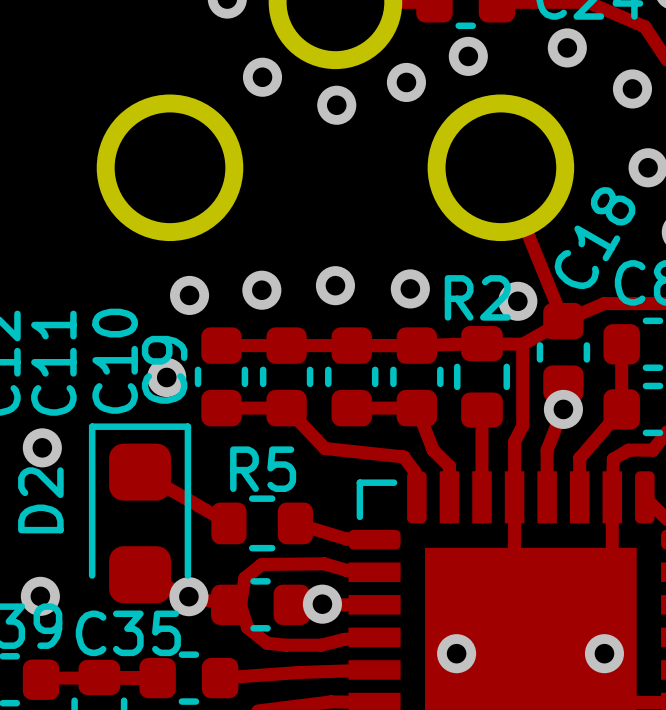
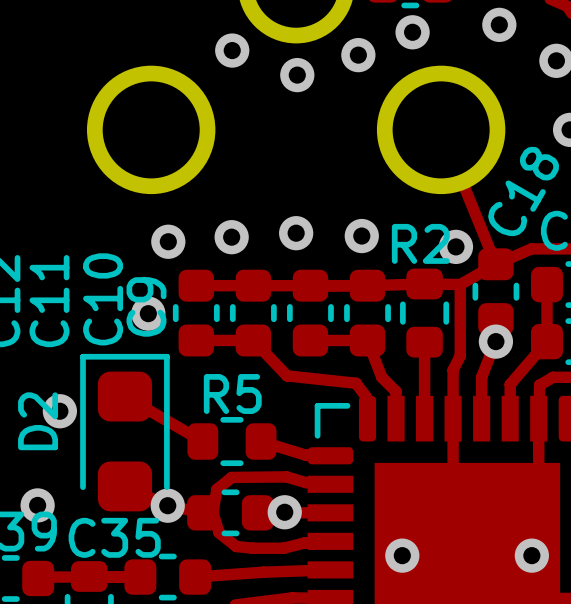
via position: (42, 447) -> (59, 411)

